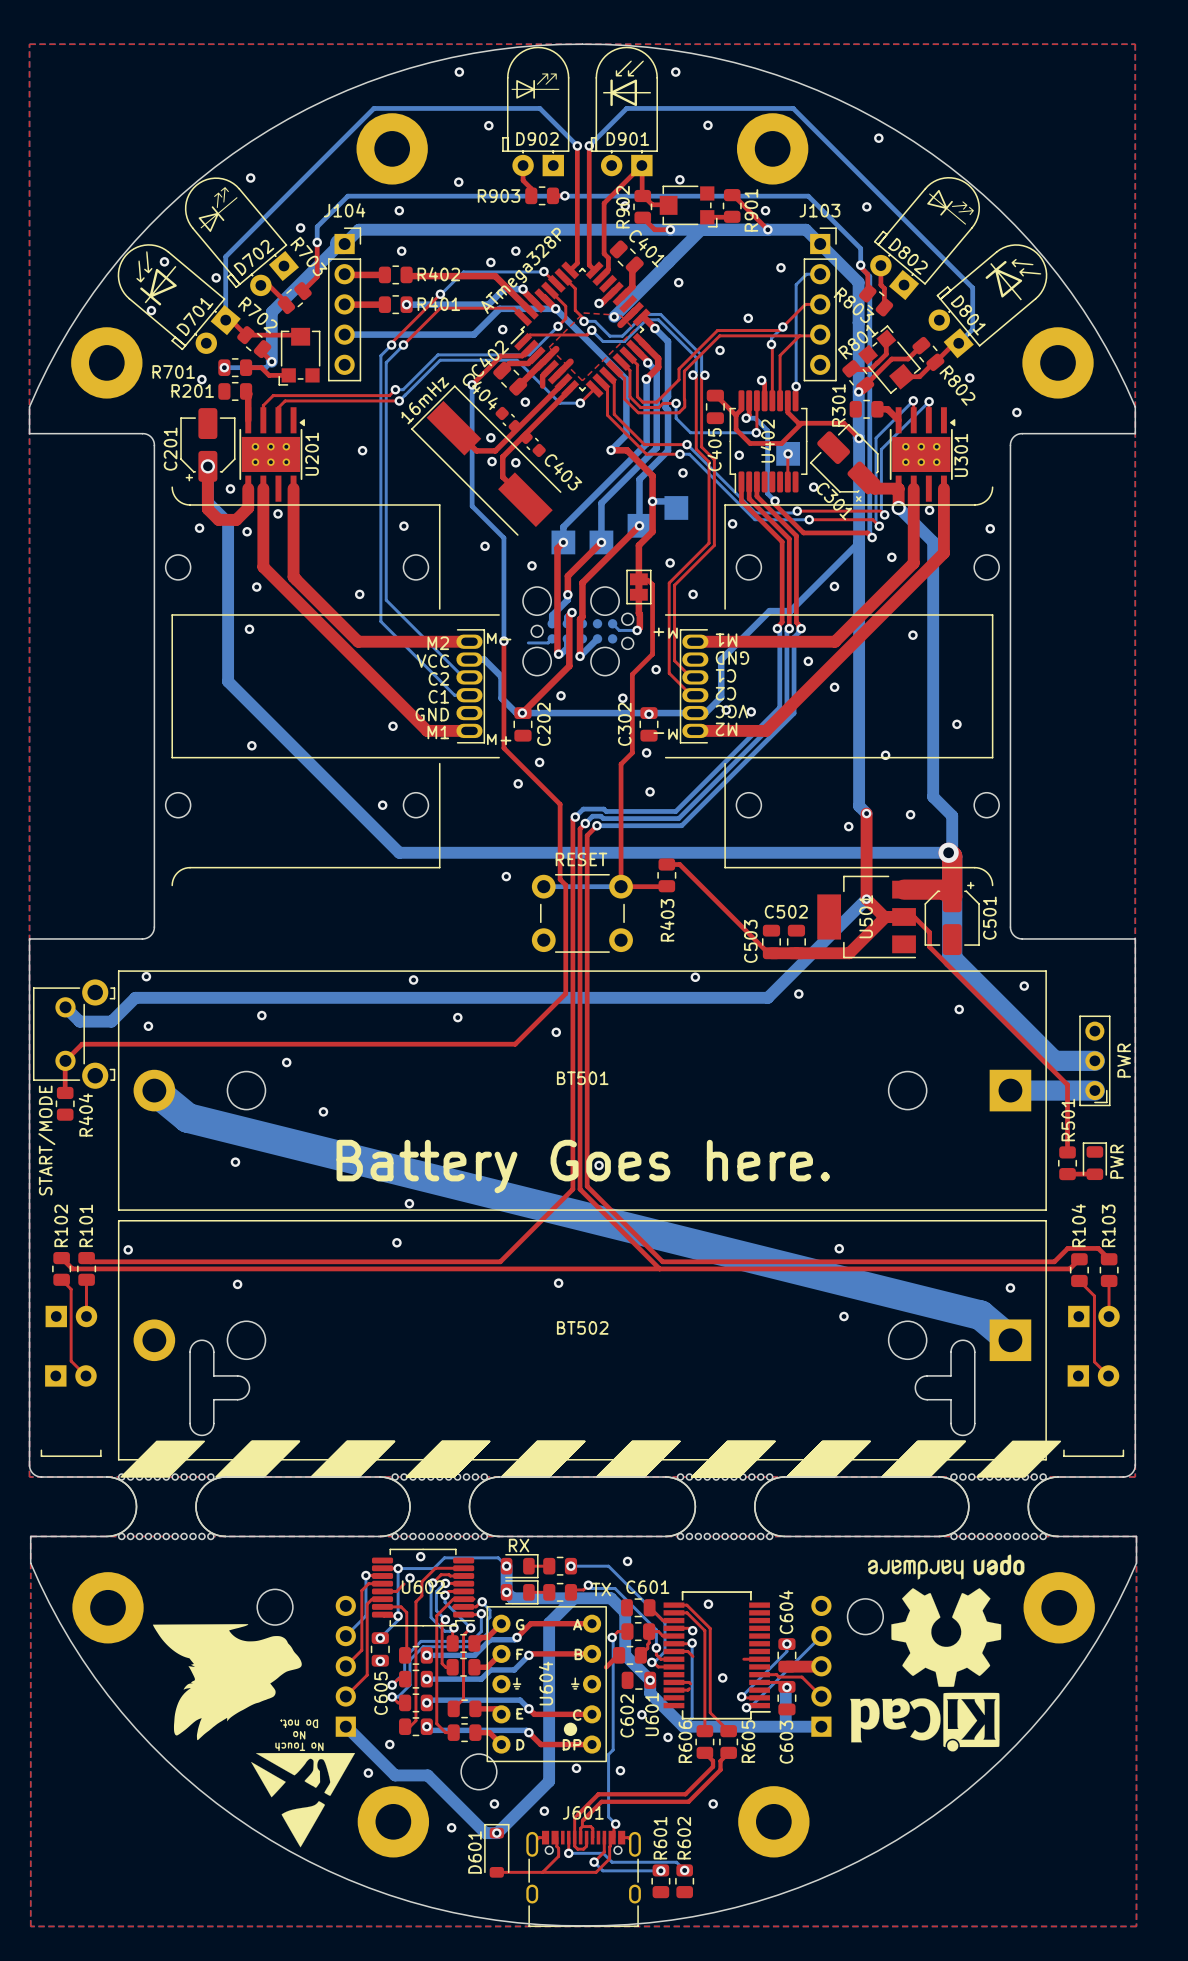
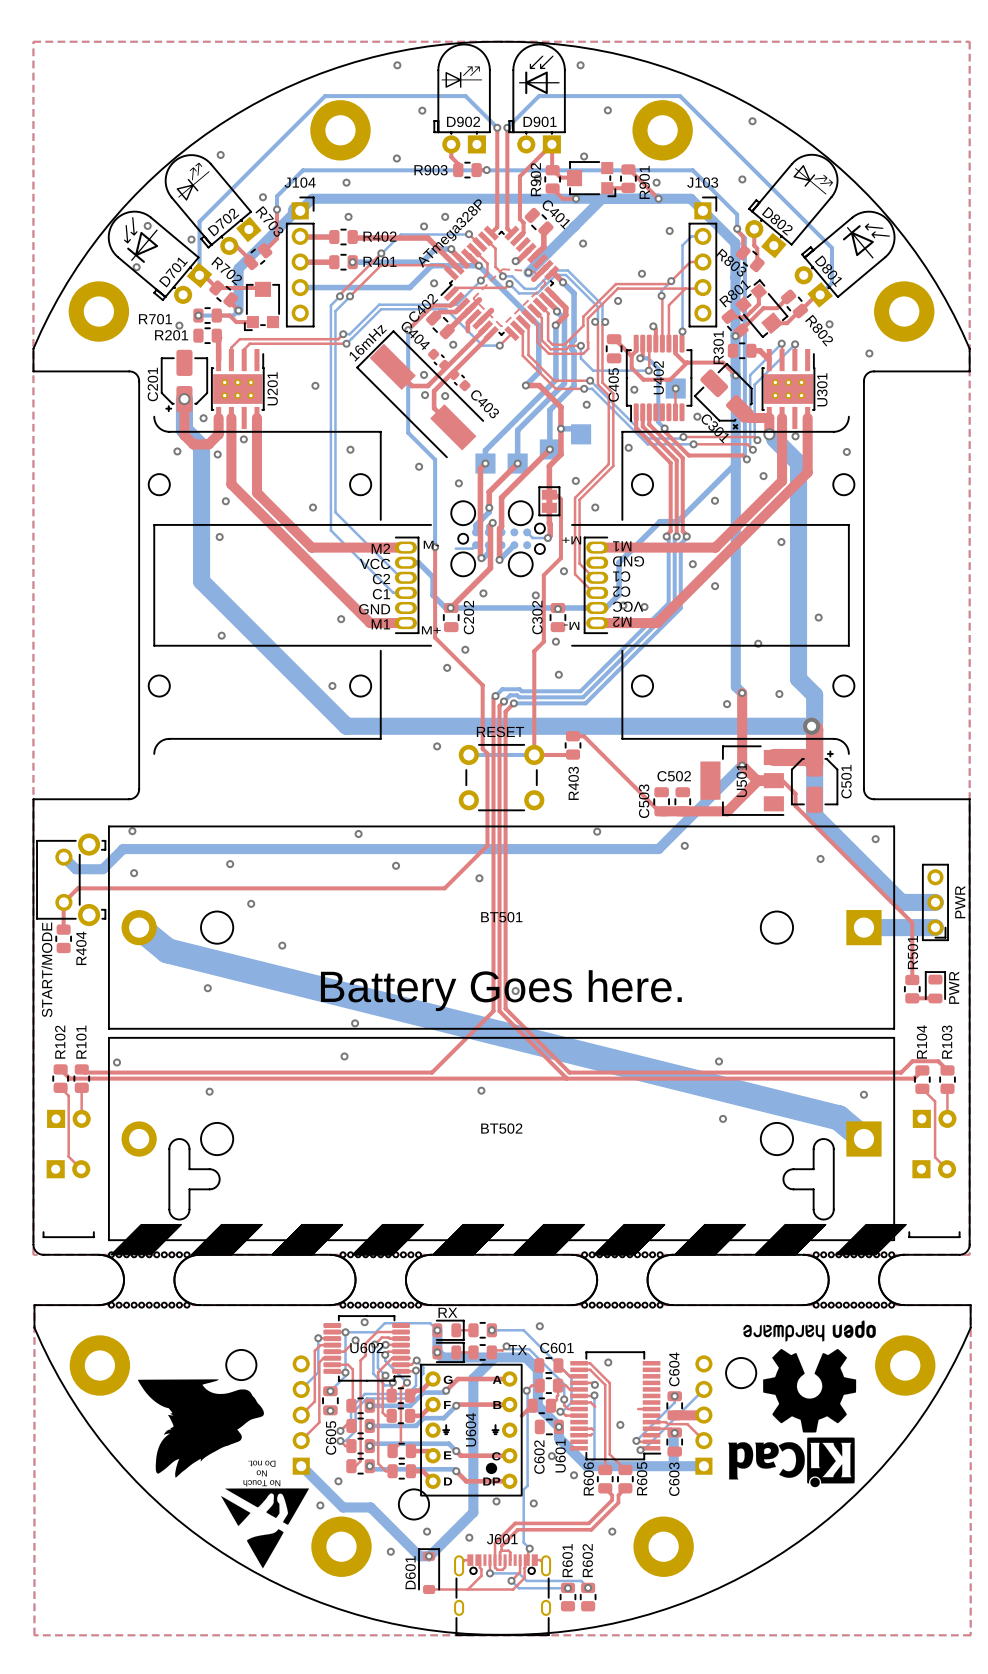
U201 footprint: [239, 407, 305, 502] -> [211, 349, 265, 430]
U301 footprint: [889, 407, 956, 502] -> [761, 349, 816, 430]
bottom track width: thin (207, 466) (207, 502) (228, 522) (228, 681) (399, 852) (948, 852) -> thick (184, 399) (184, 429) (201, 446) (201, 581) (346, 726) (811, 726)
bottom track width: thin (904, 513) (933, 541) (933, 796) (952, 815) (952, 849) -> thick (774, 439) (798, 463) (798, 678) (814, 695) (814, 723)

